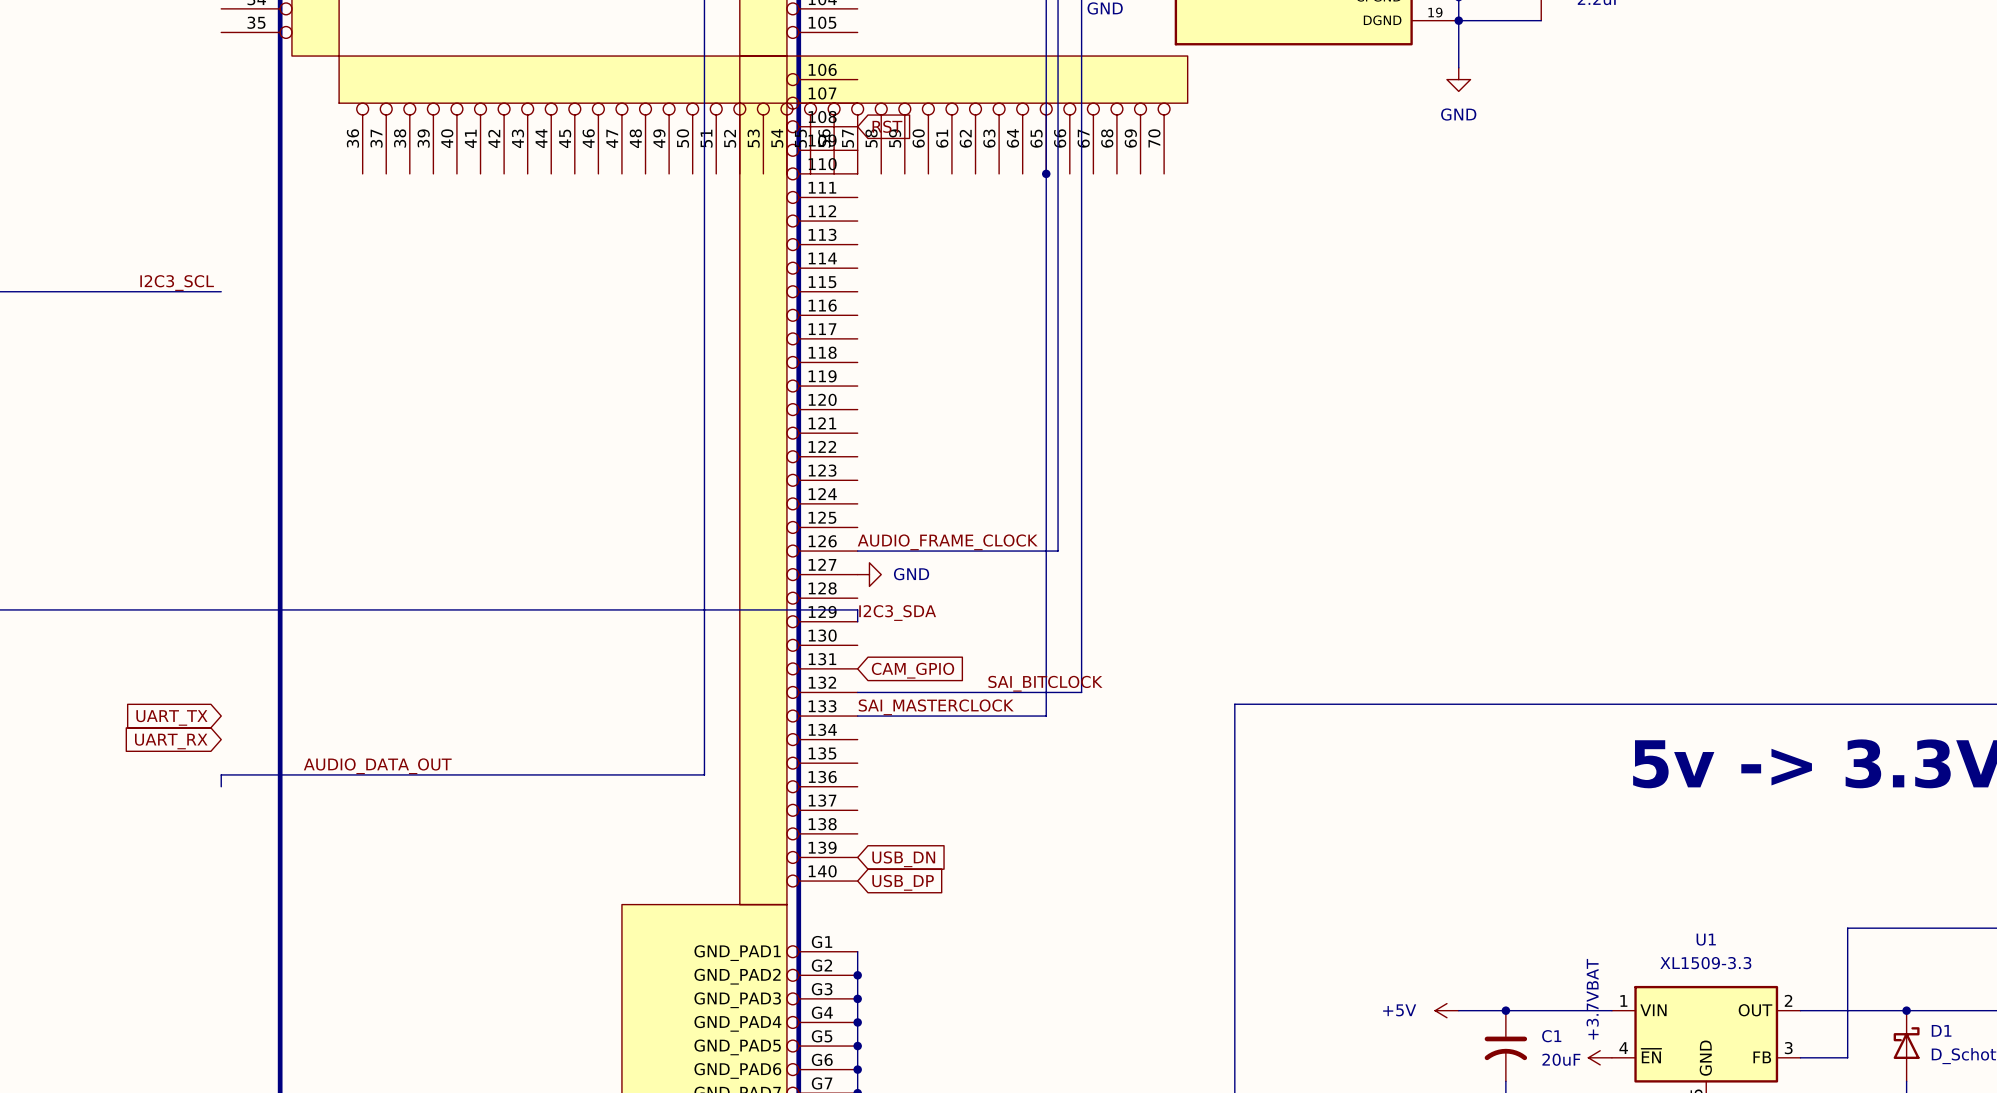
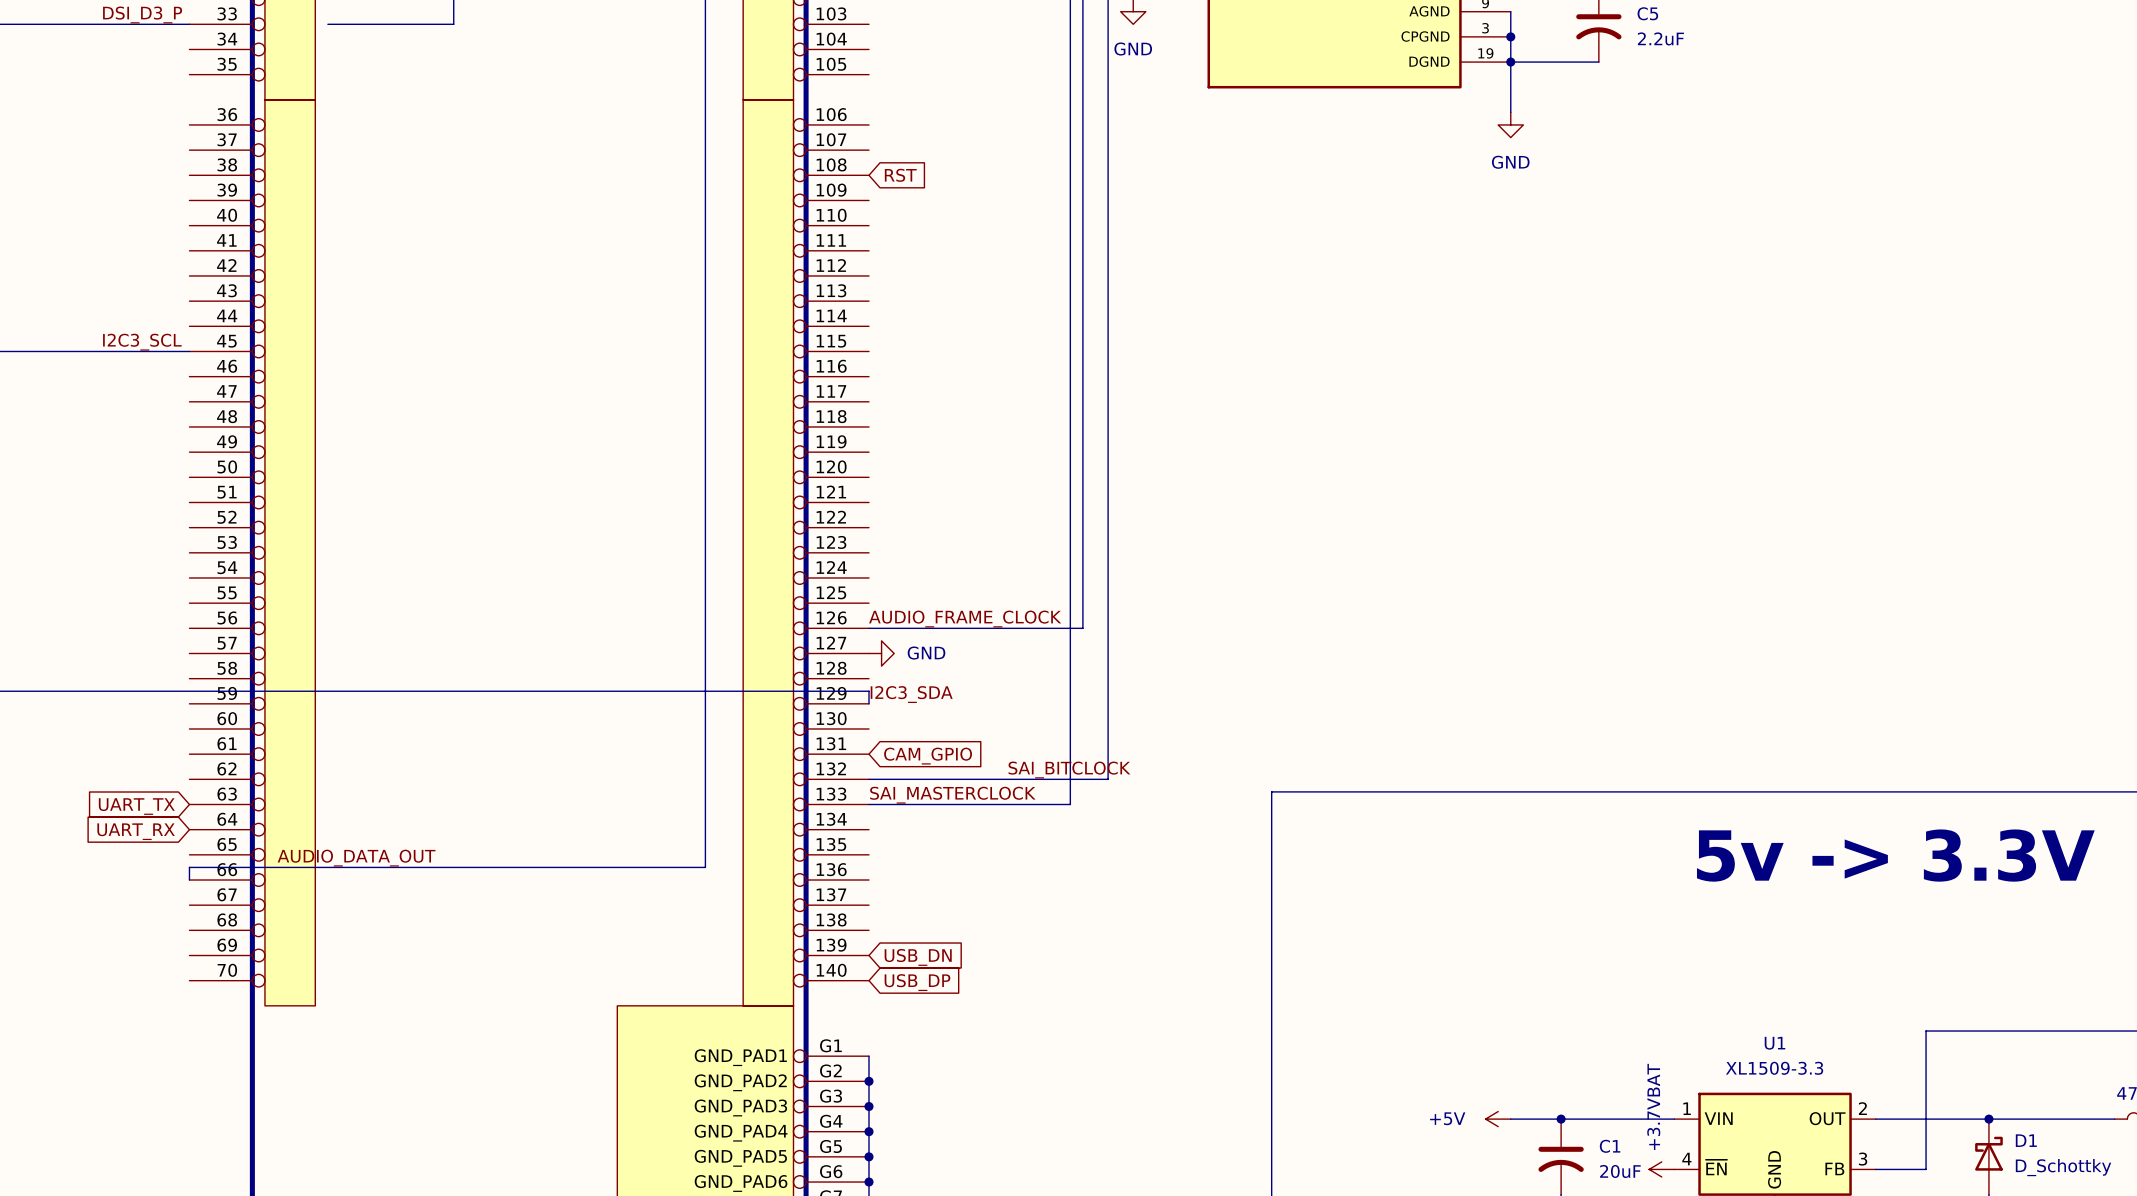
part: (763, 114) -> none
junction: (1046, 173) -> none
part: none -> (252, 552)

